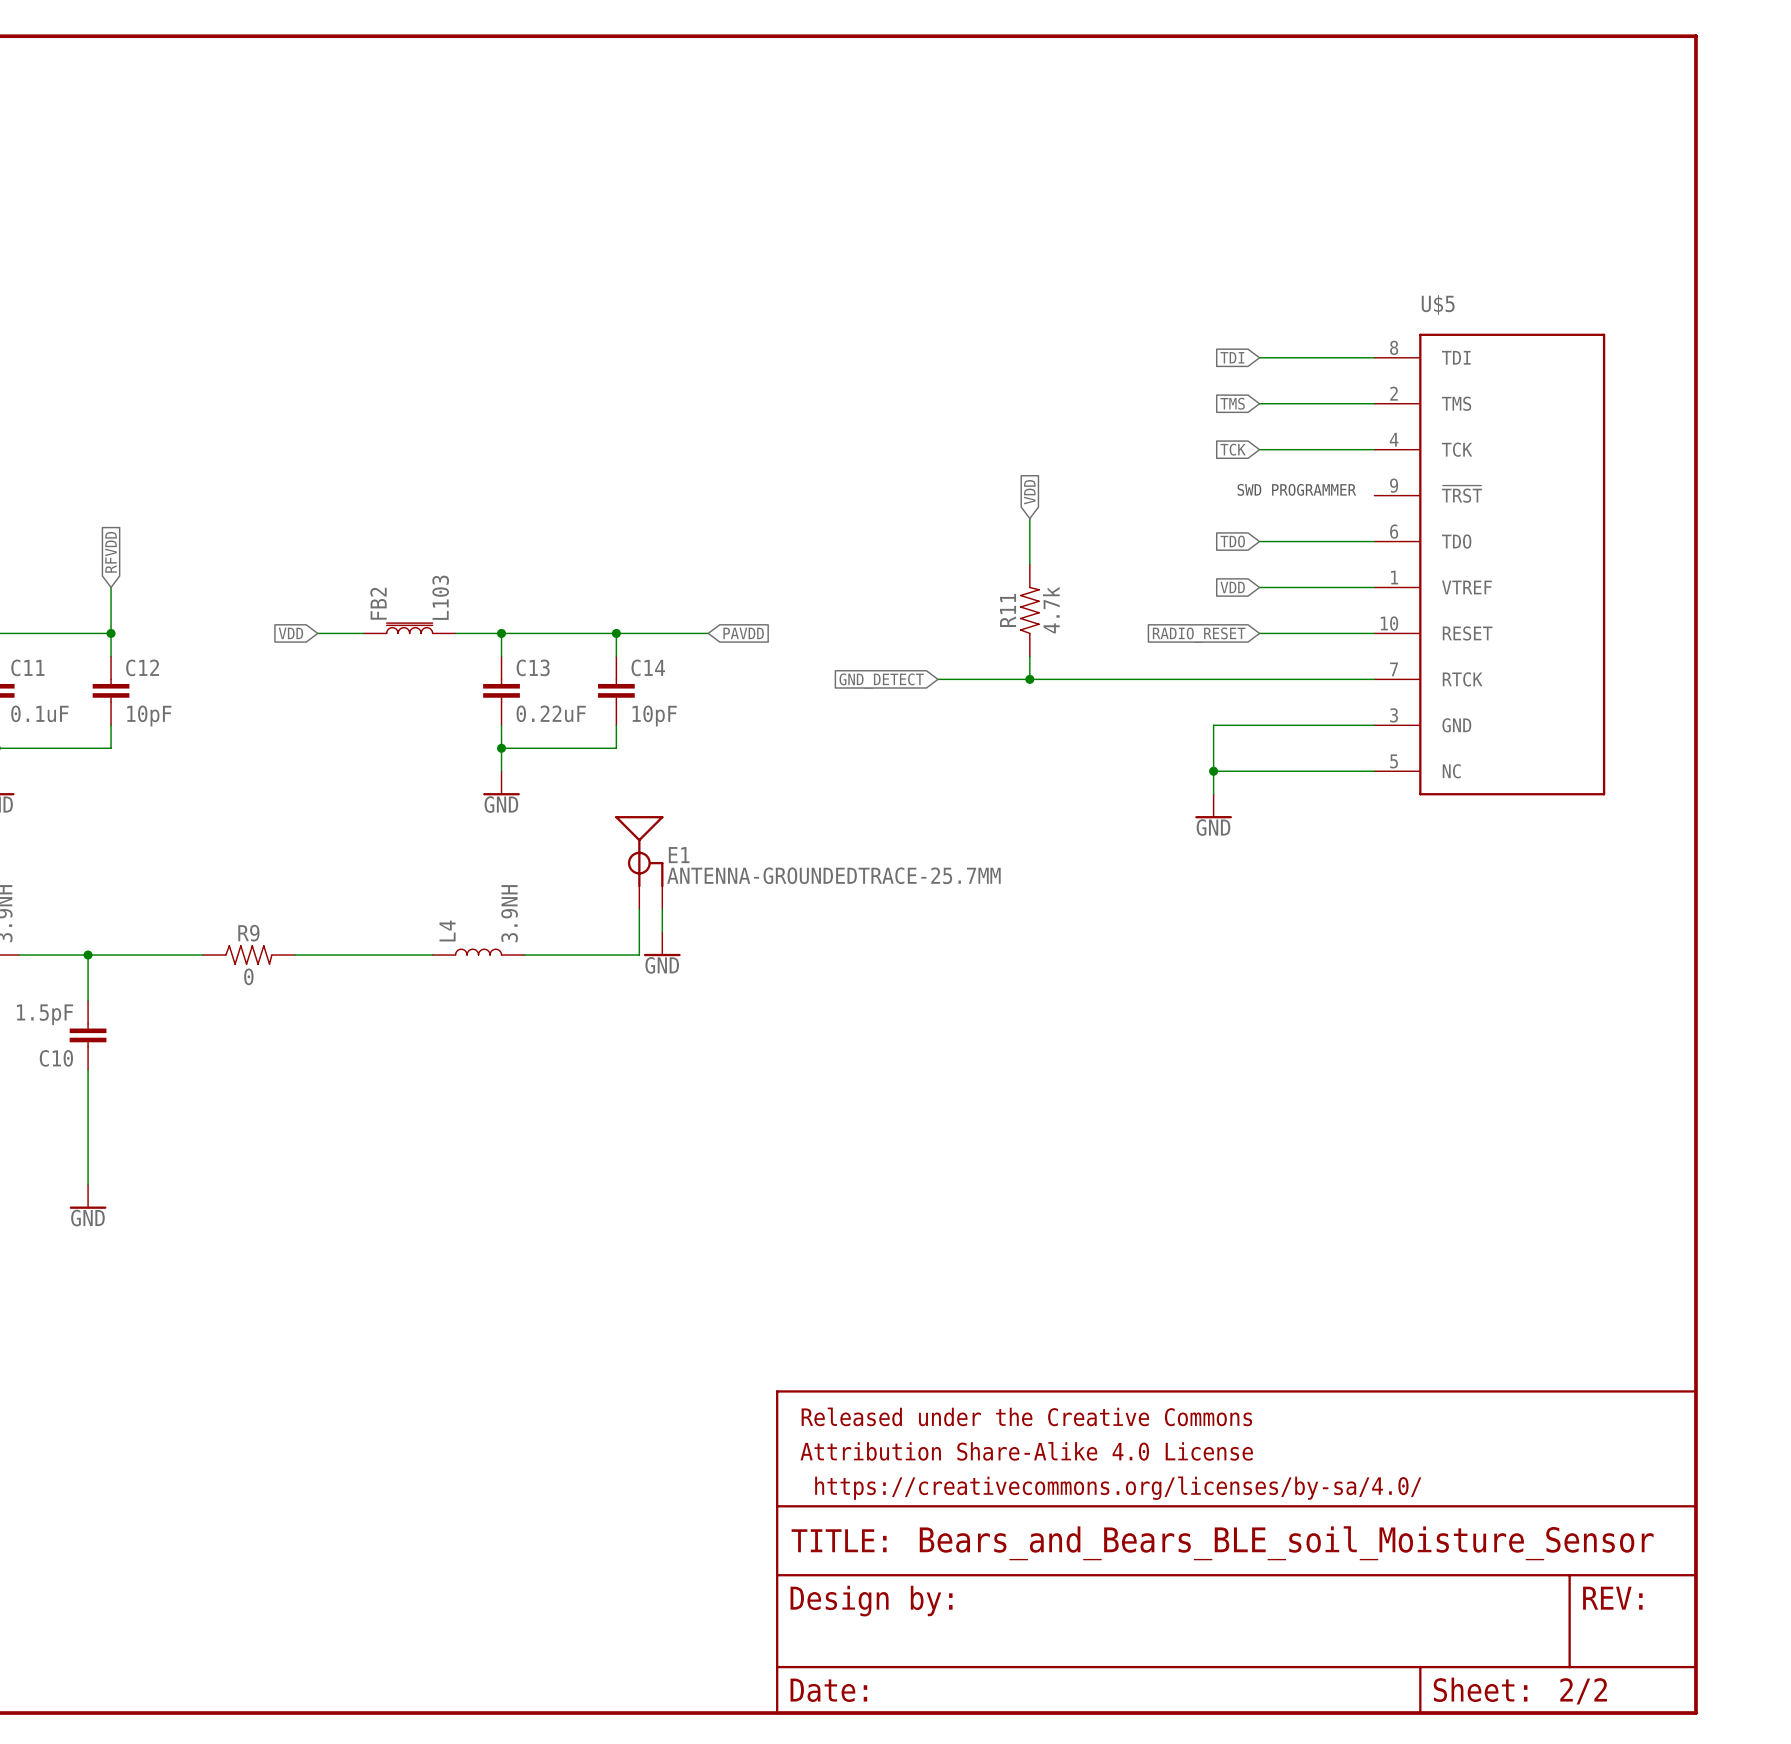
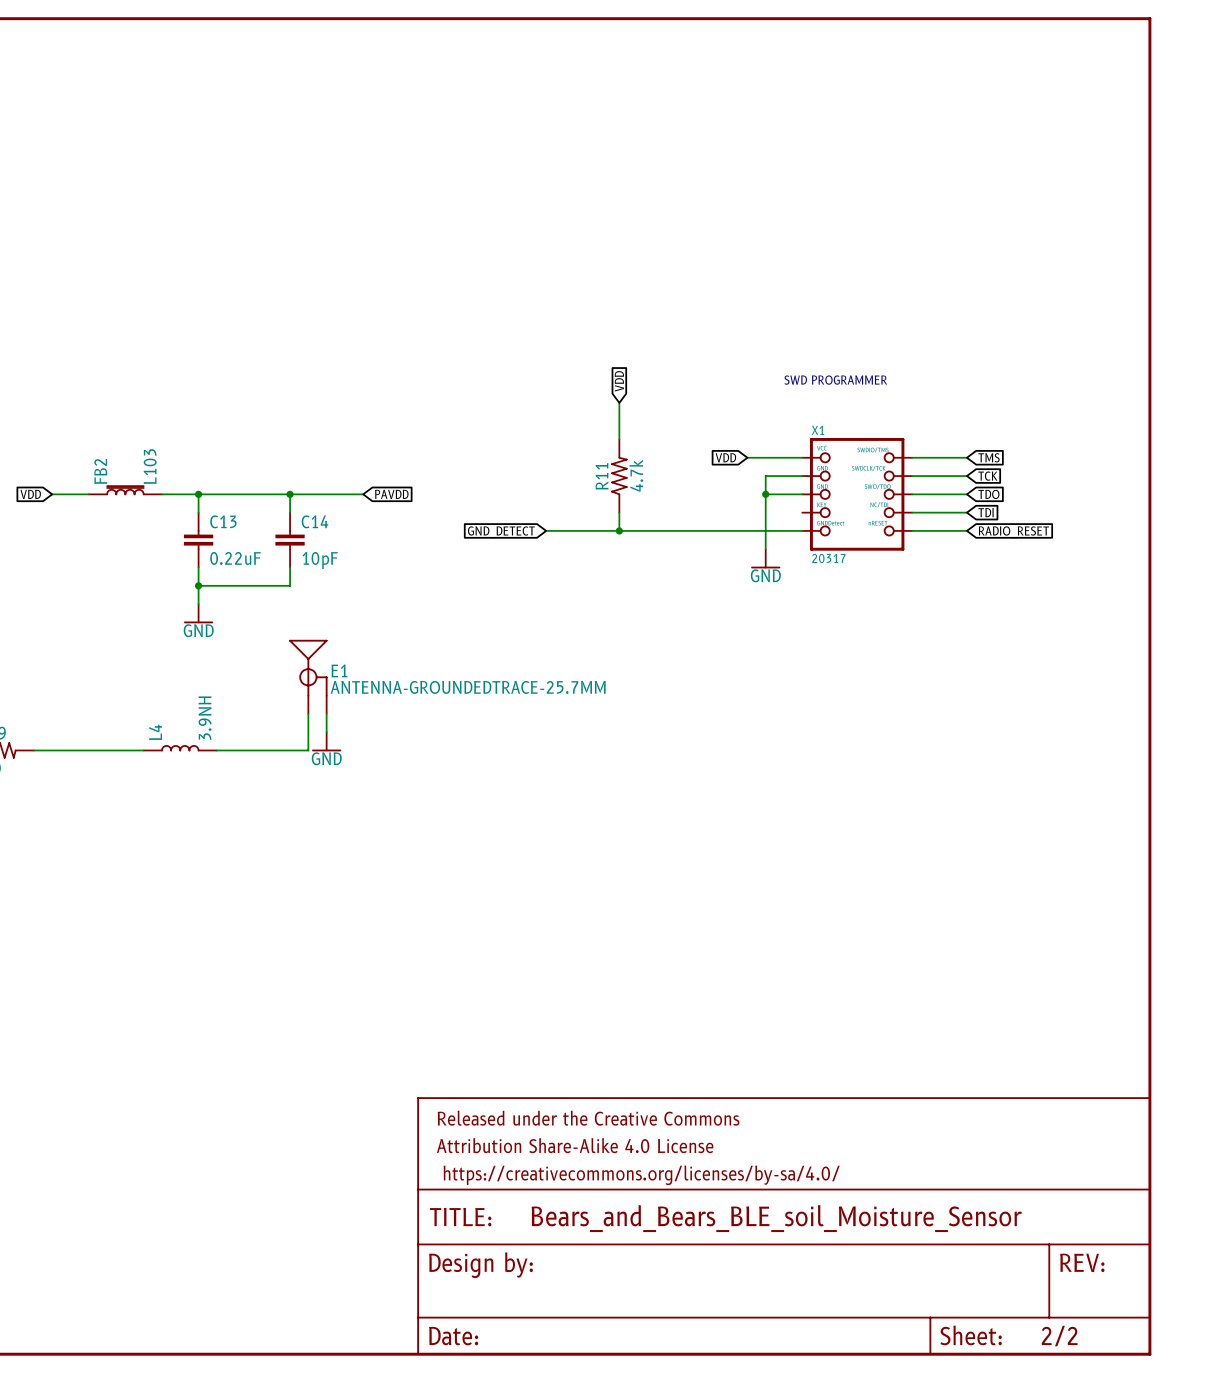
global label: TDI (1232, 357) -> none
wire: (1259, 357) (1374, 357) -> none
global label: TMS (1232, 403) -> none
wire: (1259, 403) (1374, 403) -> none
global label: TCK (1233, 449) -> none
wire: (1259, 449) (1374, 449) -> none
global label: TDO (1232, 541) -> none
wire: (1259, 541) (1374, 541) -> none
U$5: (1489, 564) -> none
global label position: VDD (1232, 587) -> VDD (725, 457)
wire: (1259, 587) (1374, 587) -> (802, 457) (747, 457)
wire: none -> (912, 457) (966, 457)
global label: none -> TMS (989, 457)
wire: none -> (802, 476) (765, 476) (765, 549)
wire: none -> (912, 476) (966, 476)
global label: none -> TCK (987, 476)
junction: none -> (765, 494)
wire: (1259, 633) (1374, 633) -> (802, 494) (765, 494)
X1: none -> 20317 (857, 494)
wire: none -> (912, 494) (966, 494)
global label: none -> TDO (988, 494)
global label rotation: 0° (1199, 635) -> 180° (1013, 532)
global label position: RADIO_RESET (1199, 635) -> RADIO_RESET (1013, 532)
wire: none -> (912, 512) (966, 512)
global label: none -> TDI (986, 512)
wire: (1259, 679) (1374, 679) -> none
wire: none -> (912, 530) (966, 530)
wire: (1374, 725) (1213, 725) (1213, 794) -> none
wire: (1213, 771) (1374, 771) -> none
junction: (1213, 771) -> none
power symbol position: GND (1213, 806) -> GND (765, 558)

